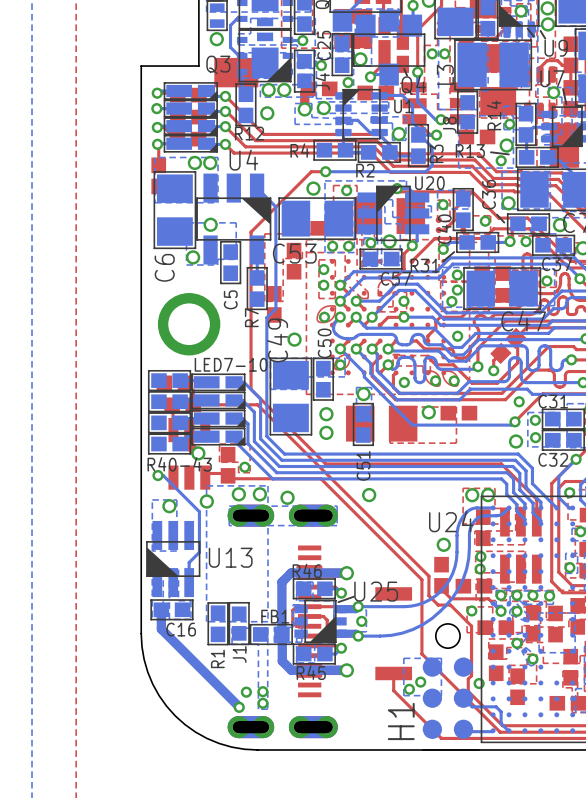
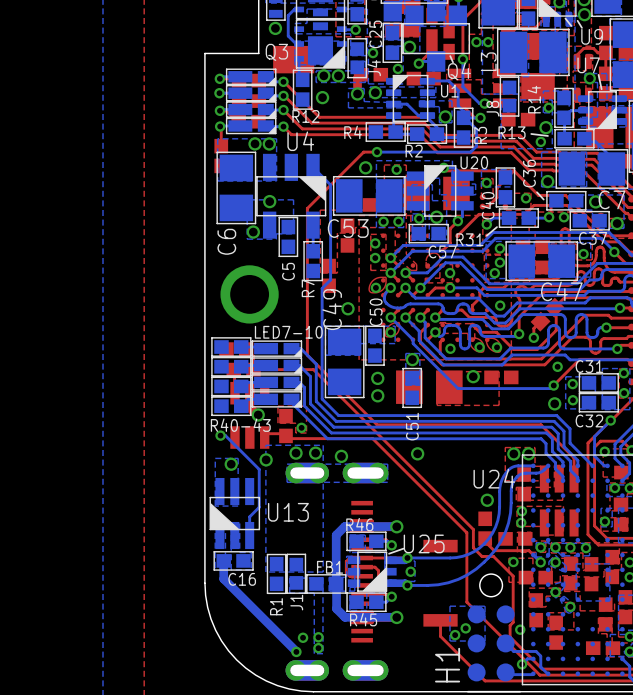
bottom track: none -> (533, 658) (527, 658) (522, 664)
via: none -> (522, 664)

